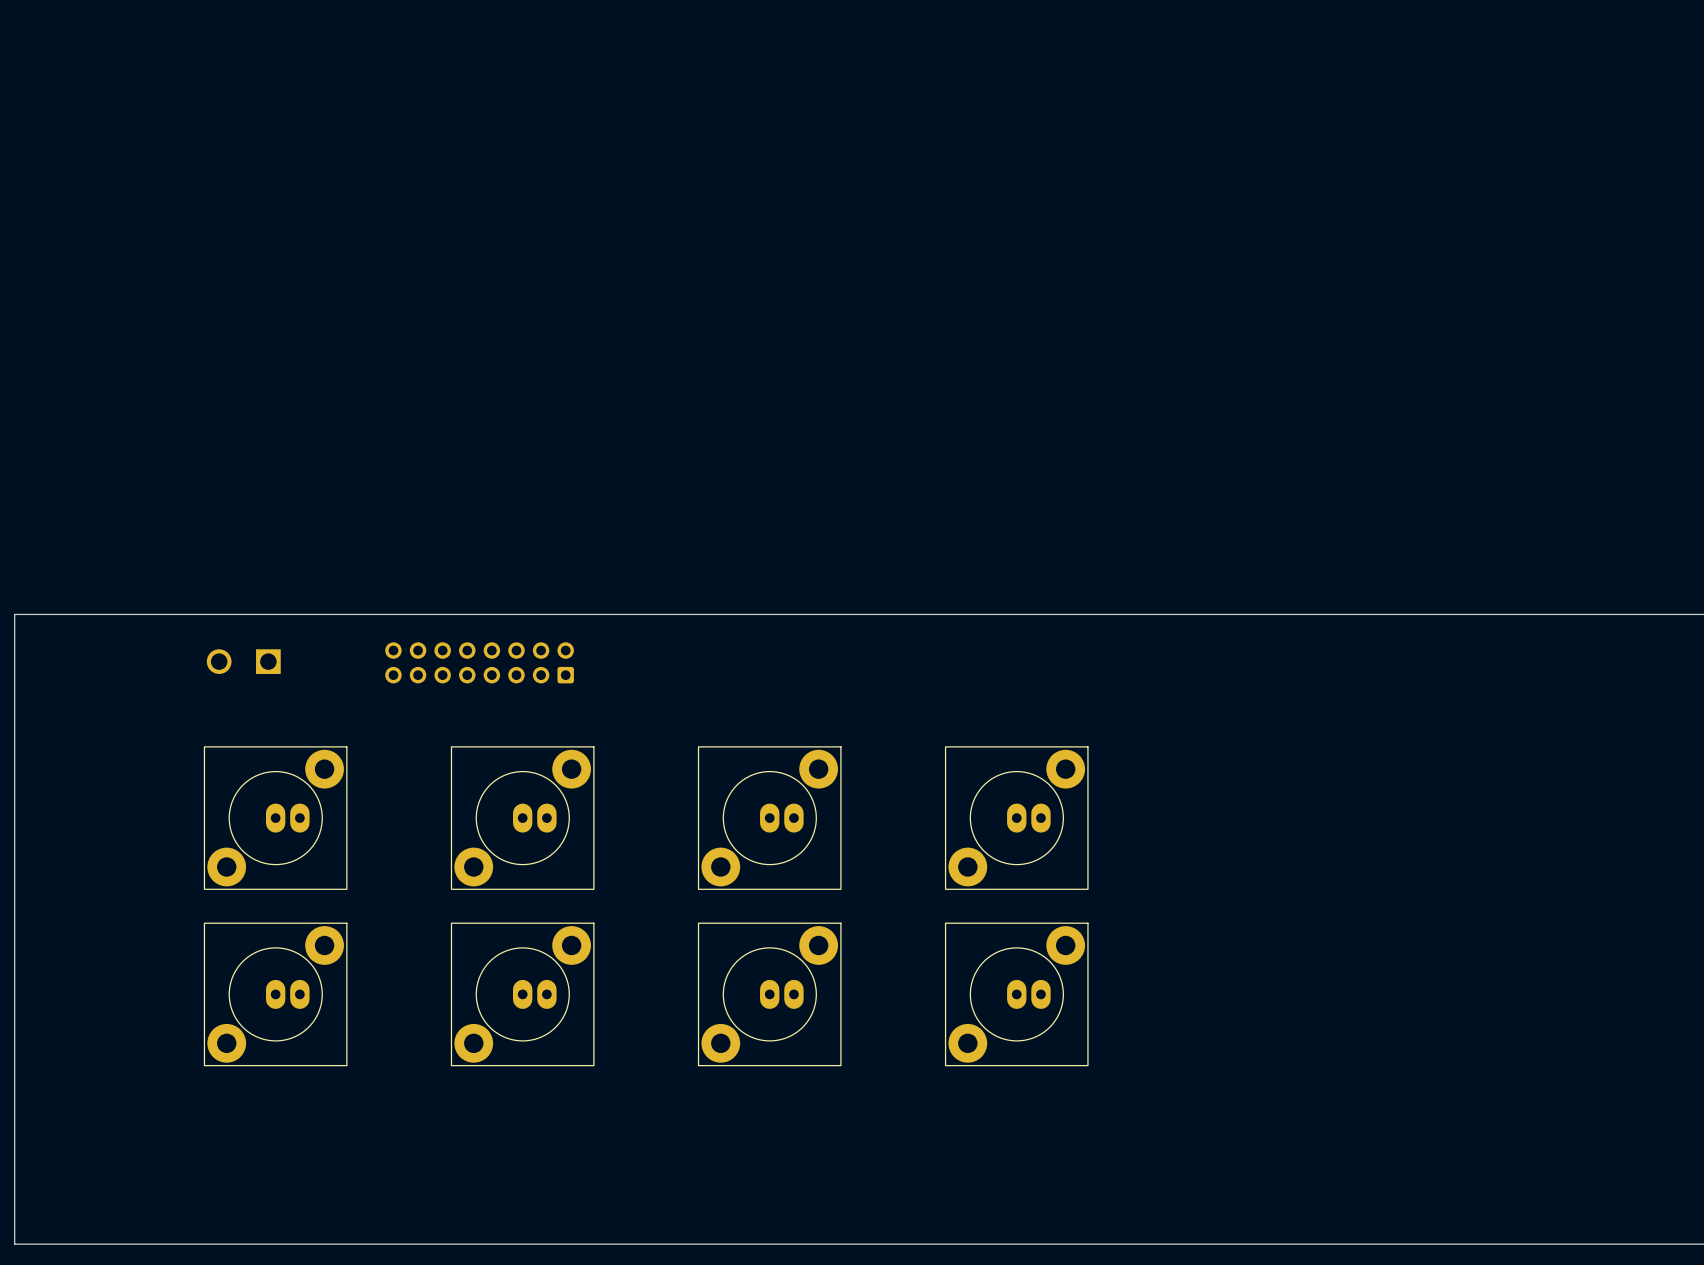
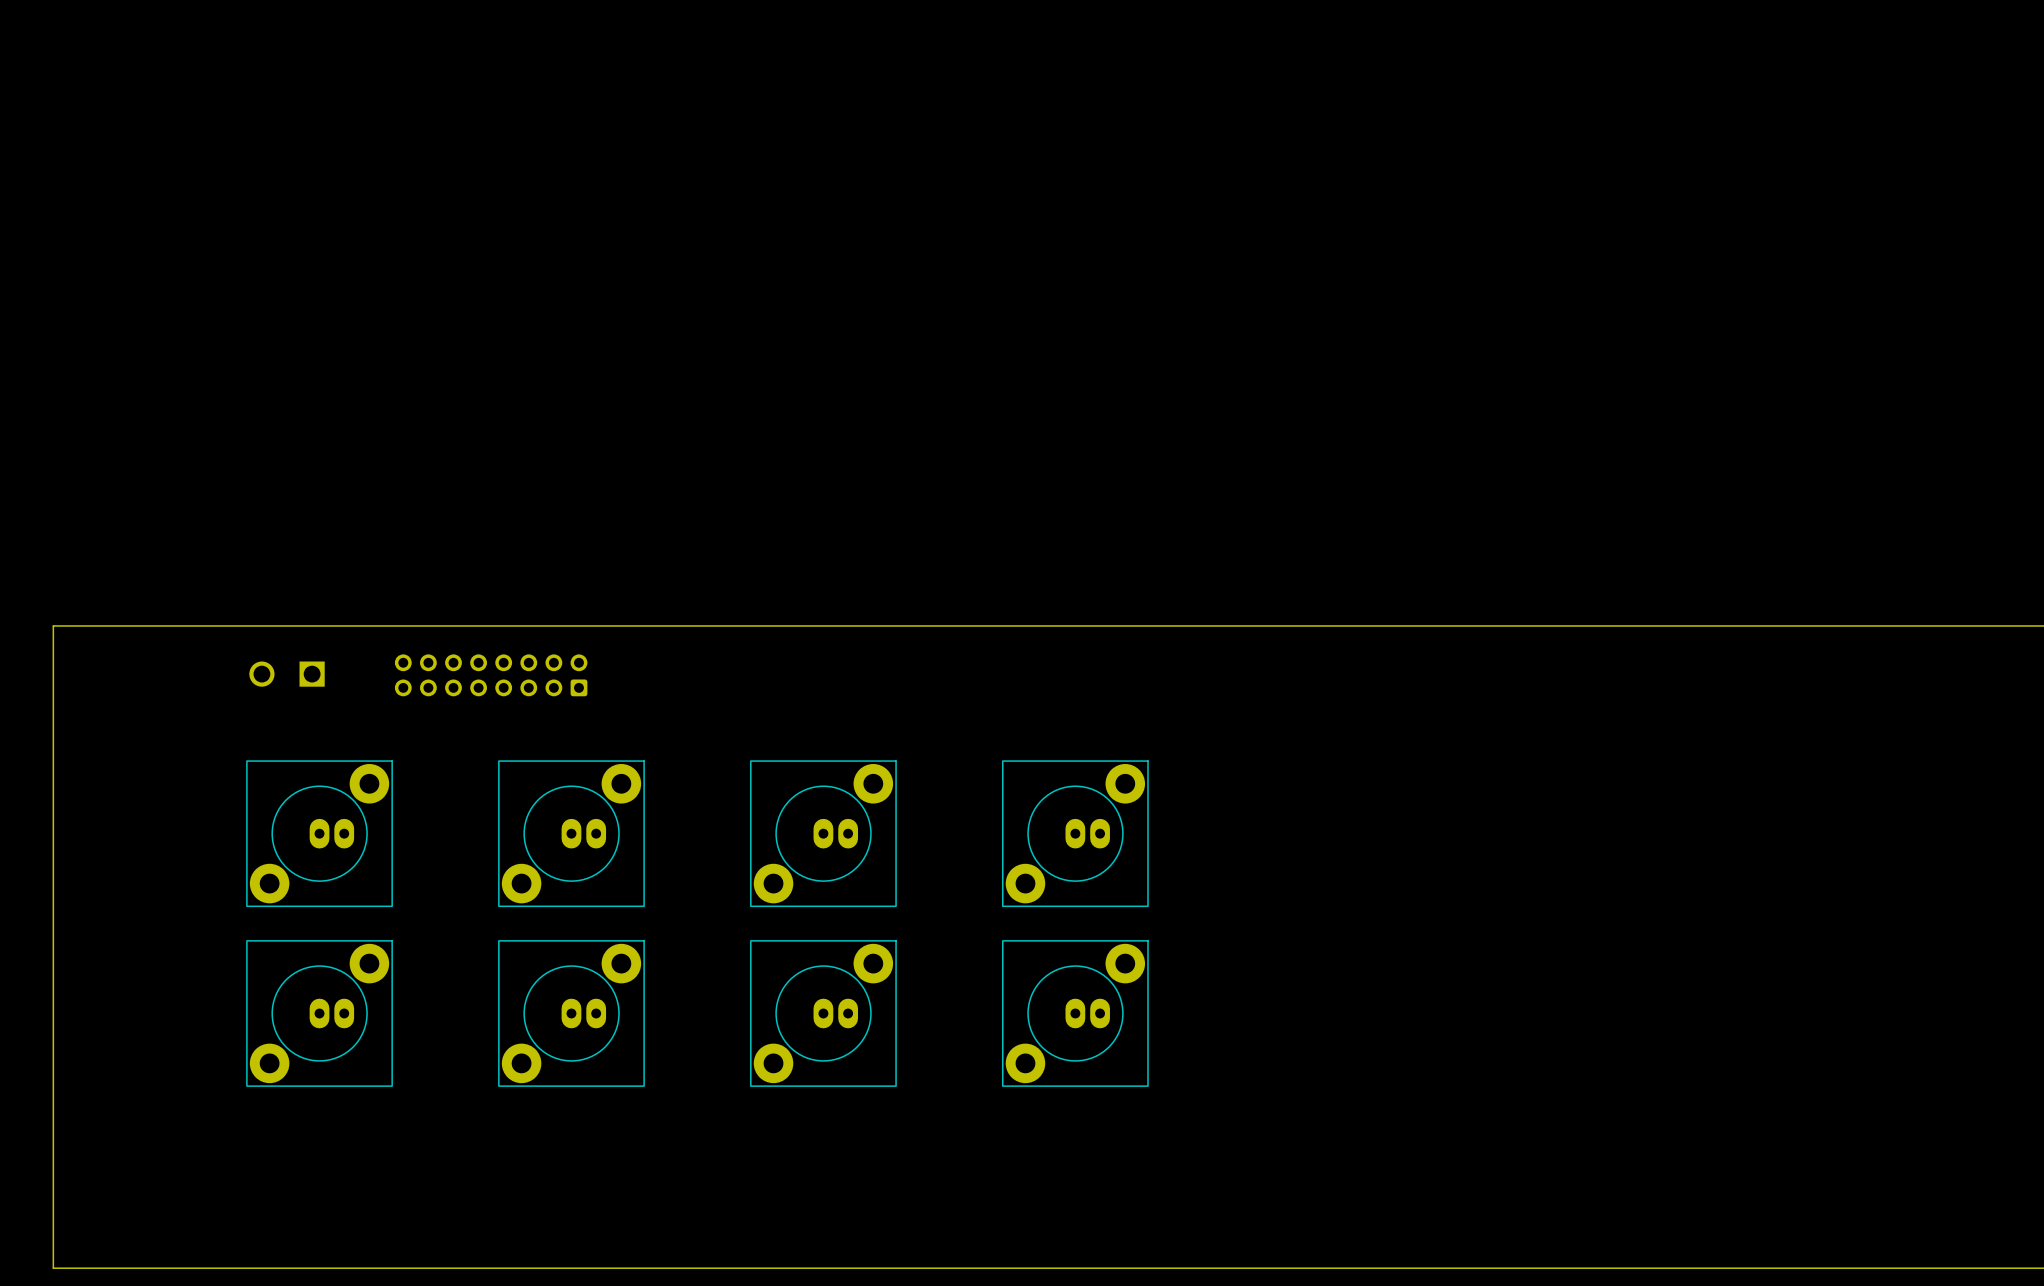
part position: (479, 662) -> (491, 675)

